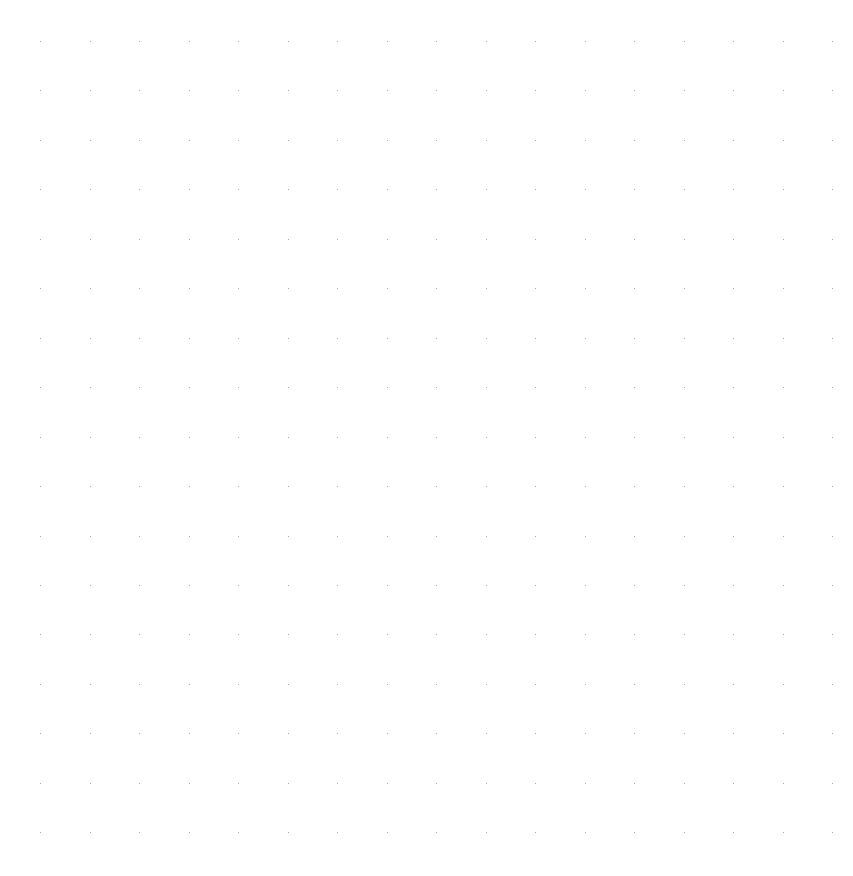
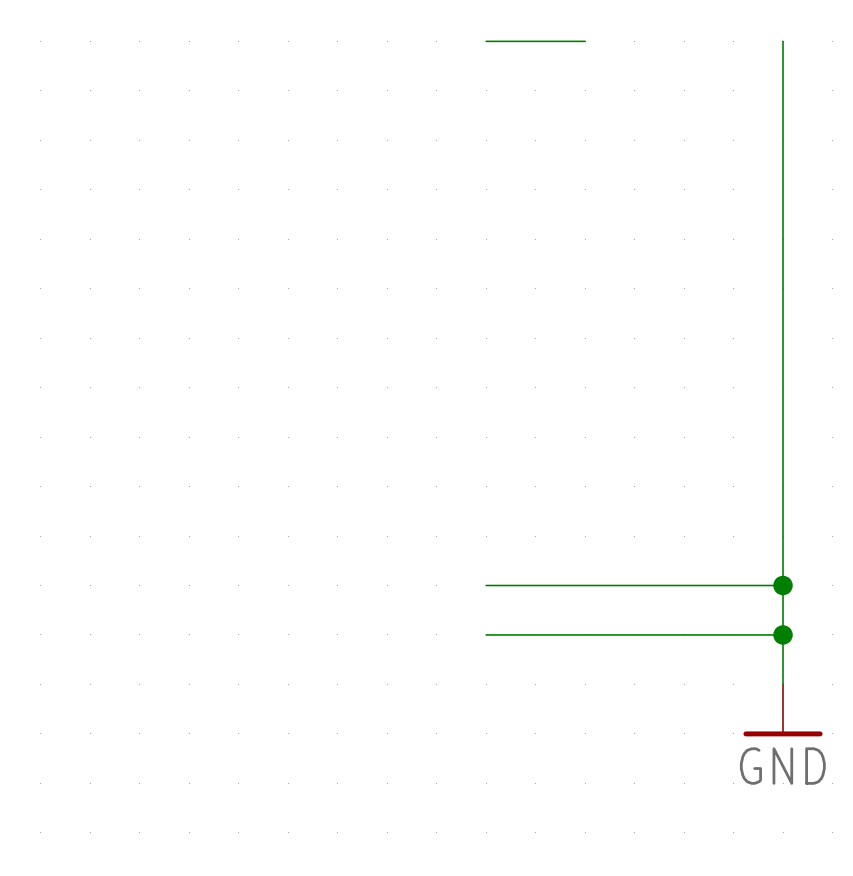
wire: none -> (486, 41) (585, 41)
wire: none -> (783, 41) (783, 684)
wire: none -> (486, 585) (783, 585)
junction: none -> (783, 585)
wire: none -> (486, 634) (783, 634)
junction: none -> (783, 634)
power symbol: none -> GND (783, 710)

